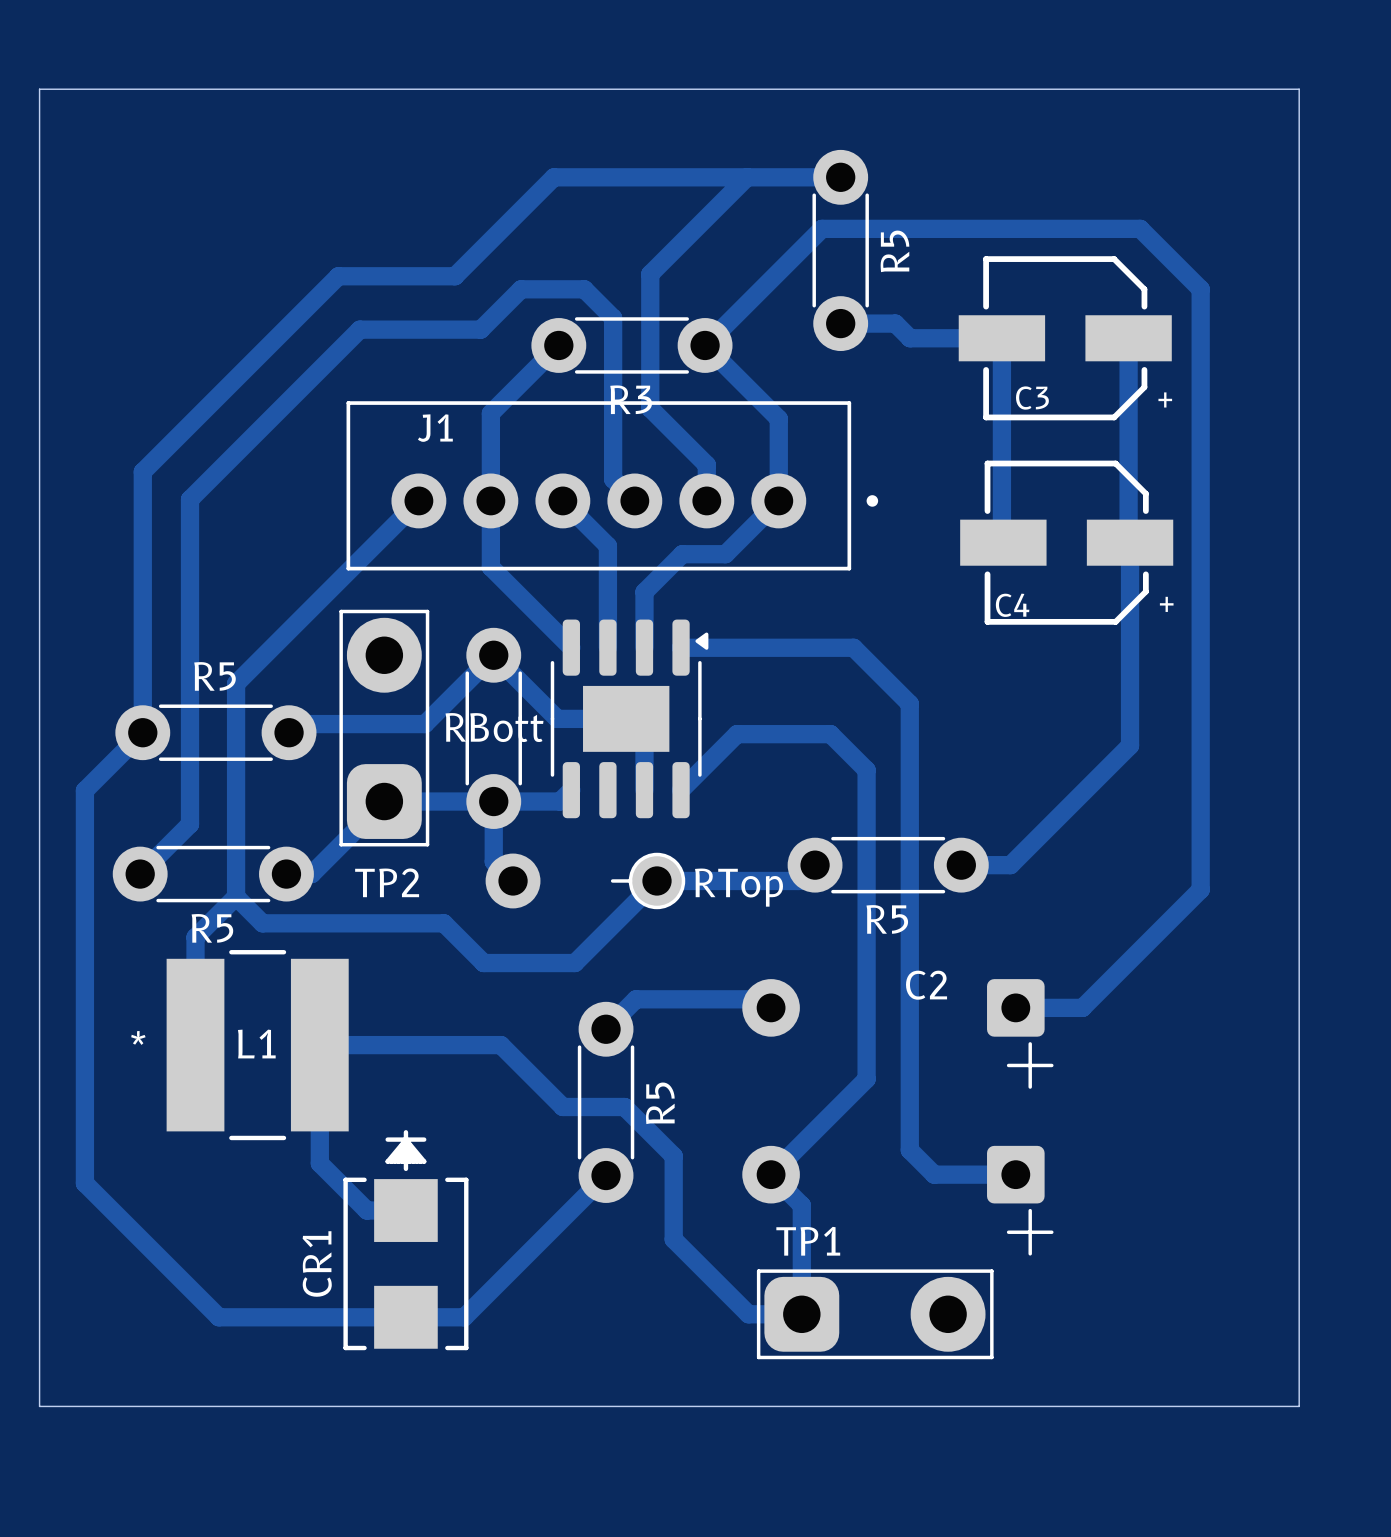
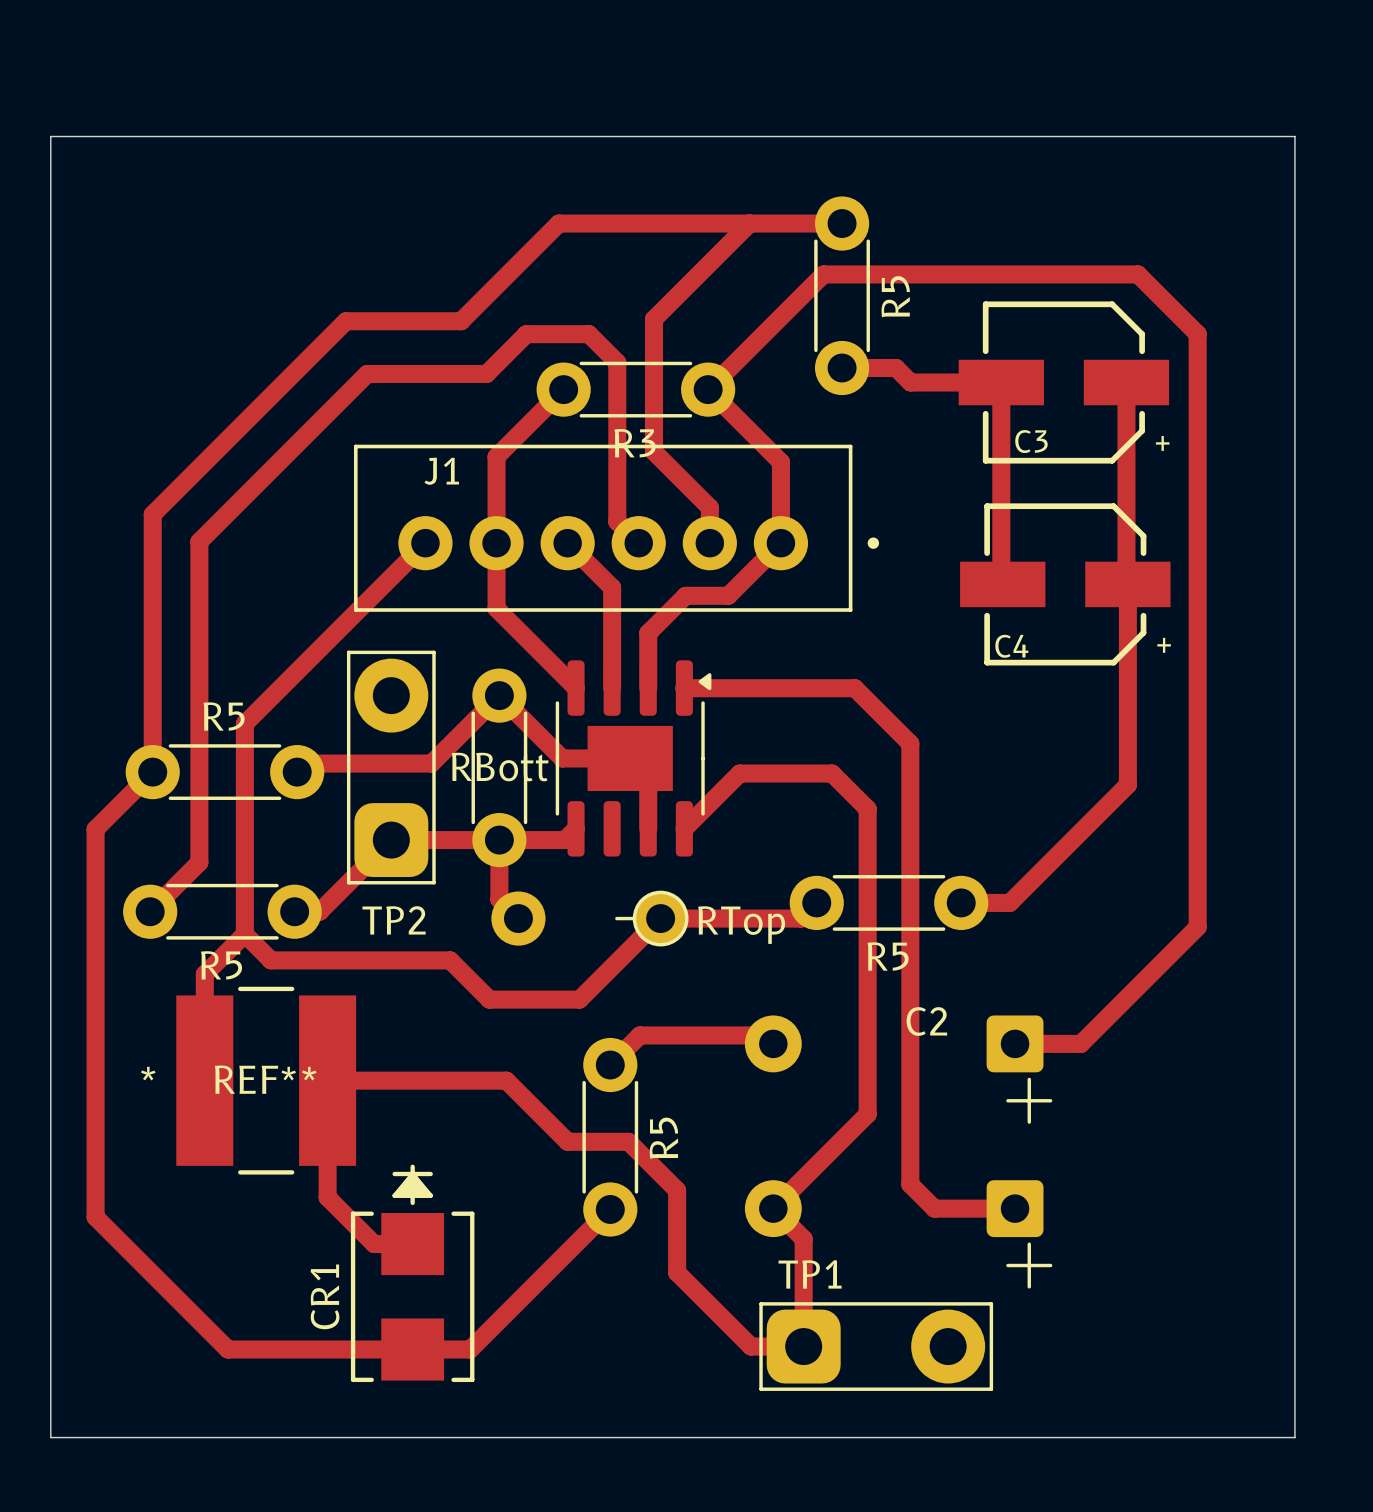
L1 name: L1 (256, 1044) -> REF** (265, 1079)

